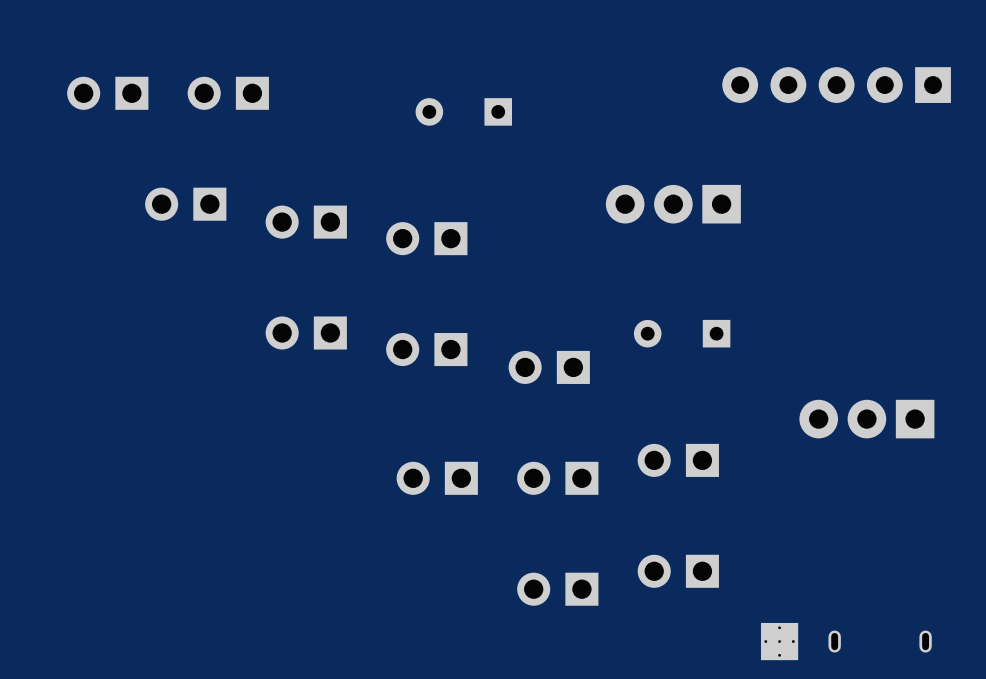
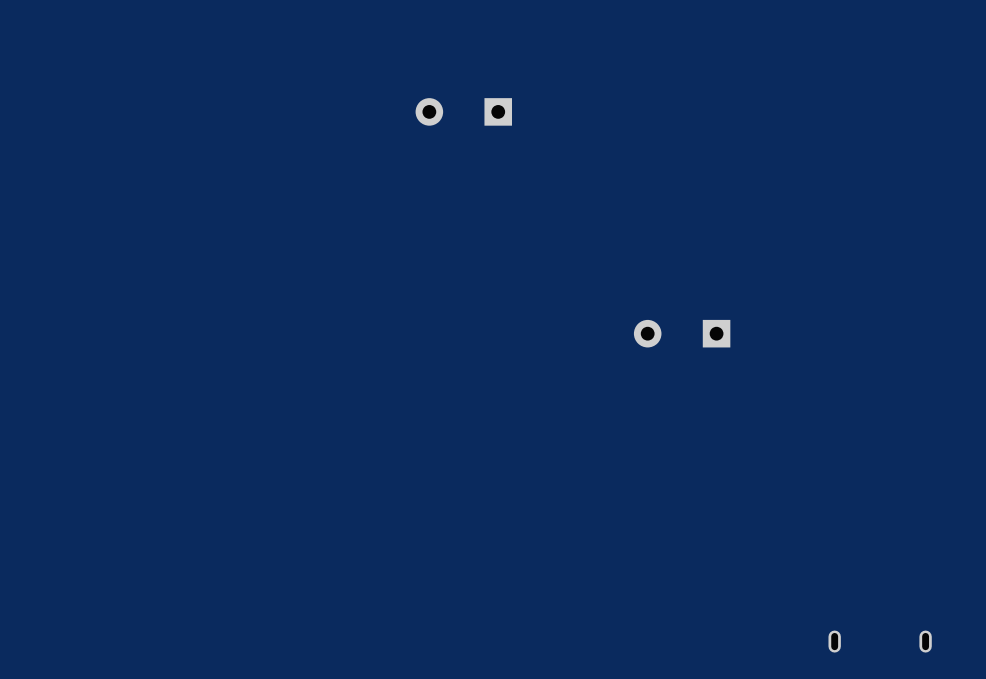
part: (836, 85) -> none
part: (107, 93) -> none
part: (228, 93) -> none
part: (185, 204) -> none
part: (673, 204) -> none
part: (306, 222) -> none
part: (426, 238) -> none
part: (306, 332) -> none
part: (426, 349) -> none
part: (549, 367) -> none
part: (866, 419) -> none
part: (678, 460) -> none
part: (437, 478) -> none
part: (557, 478) -> none
part: (678, 571) -> none
part: (557, 589) -> none
part: (779, 641) -> none

